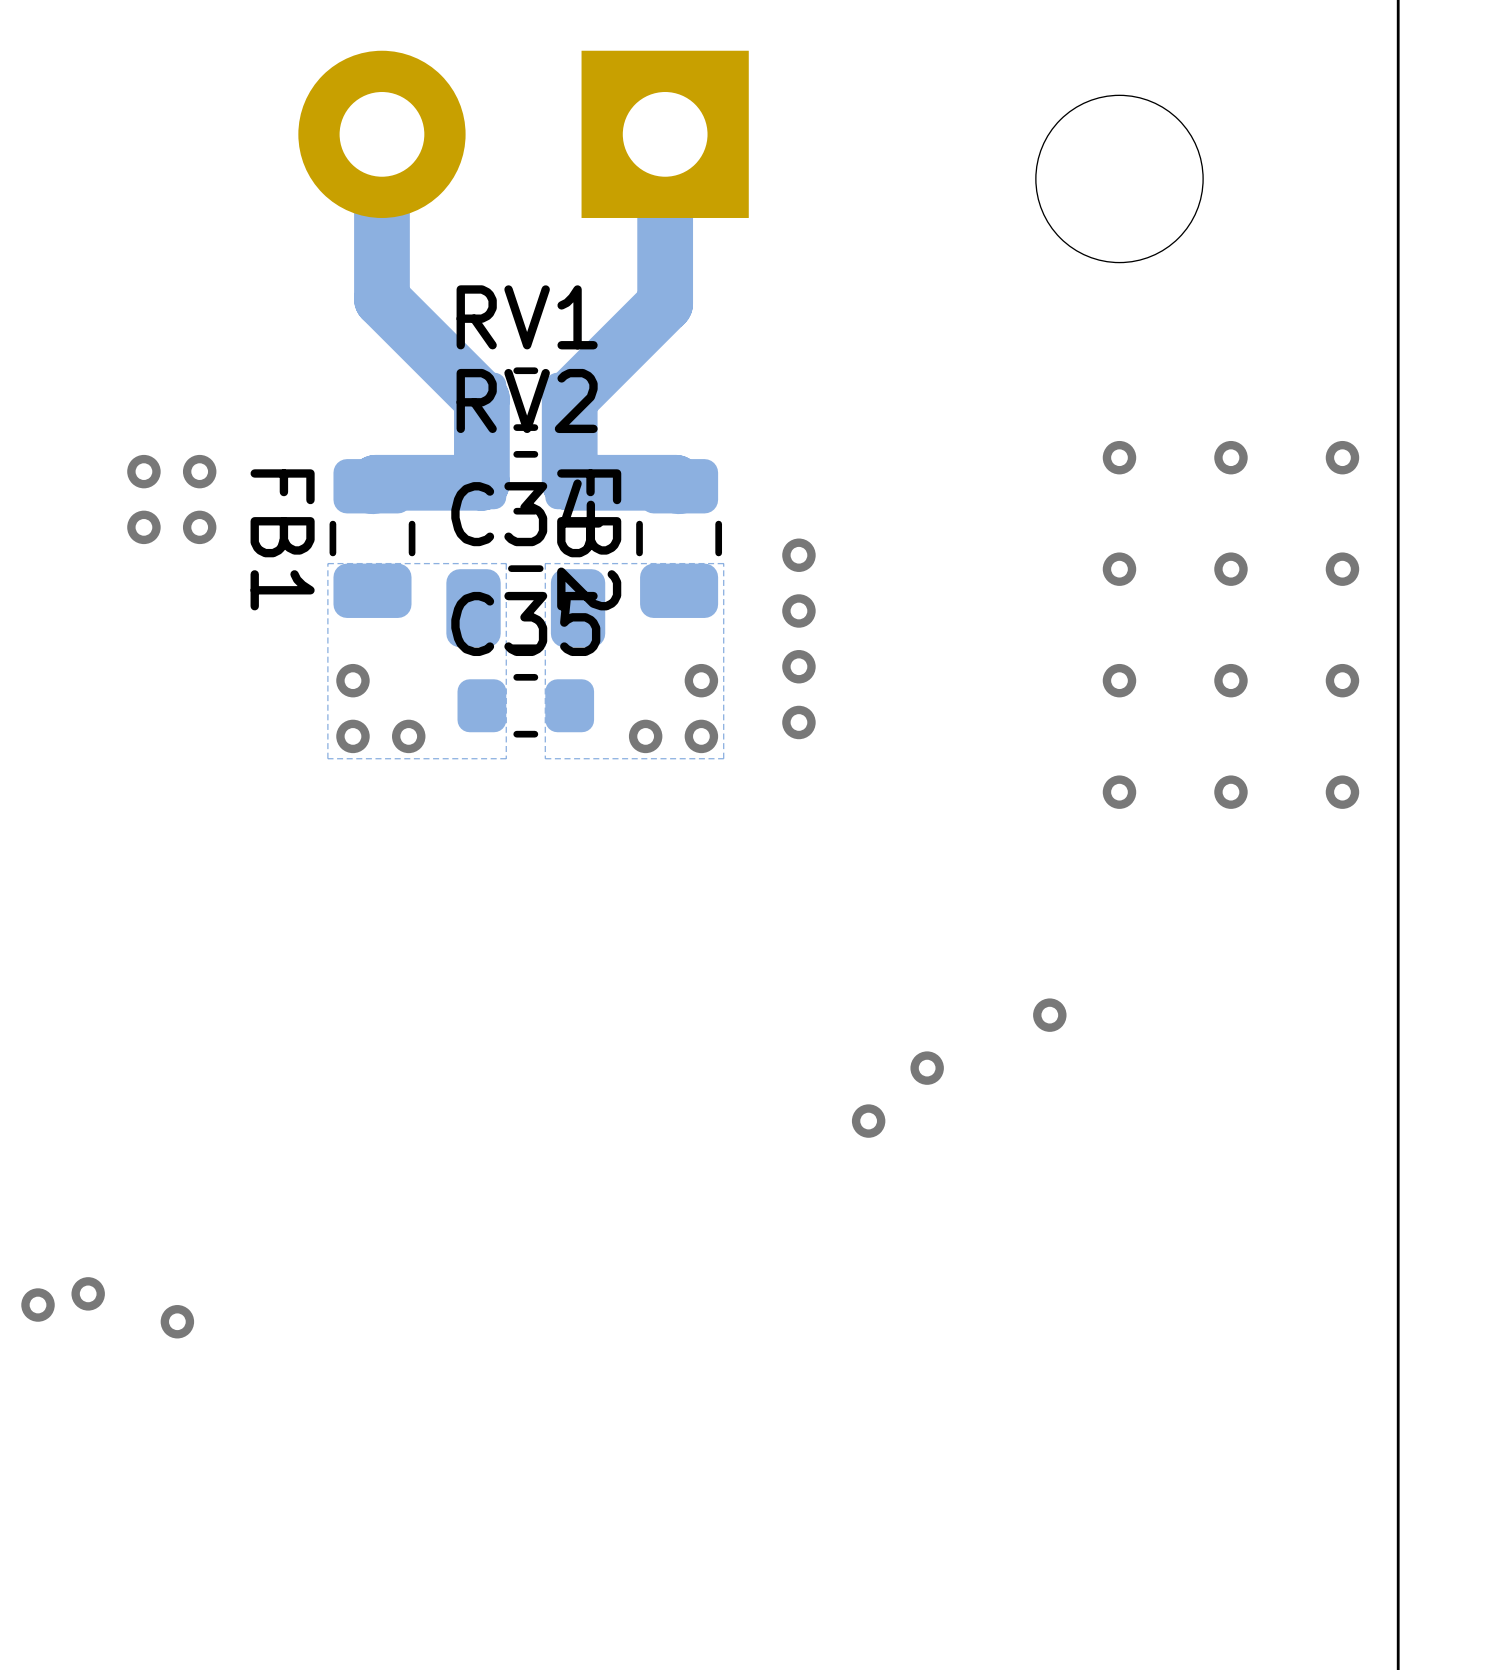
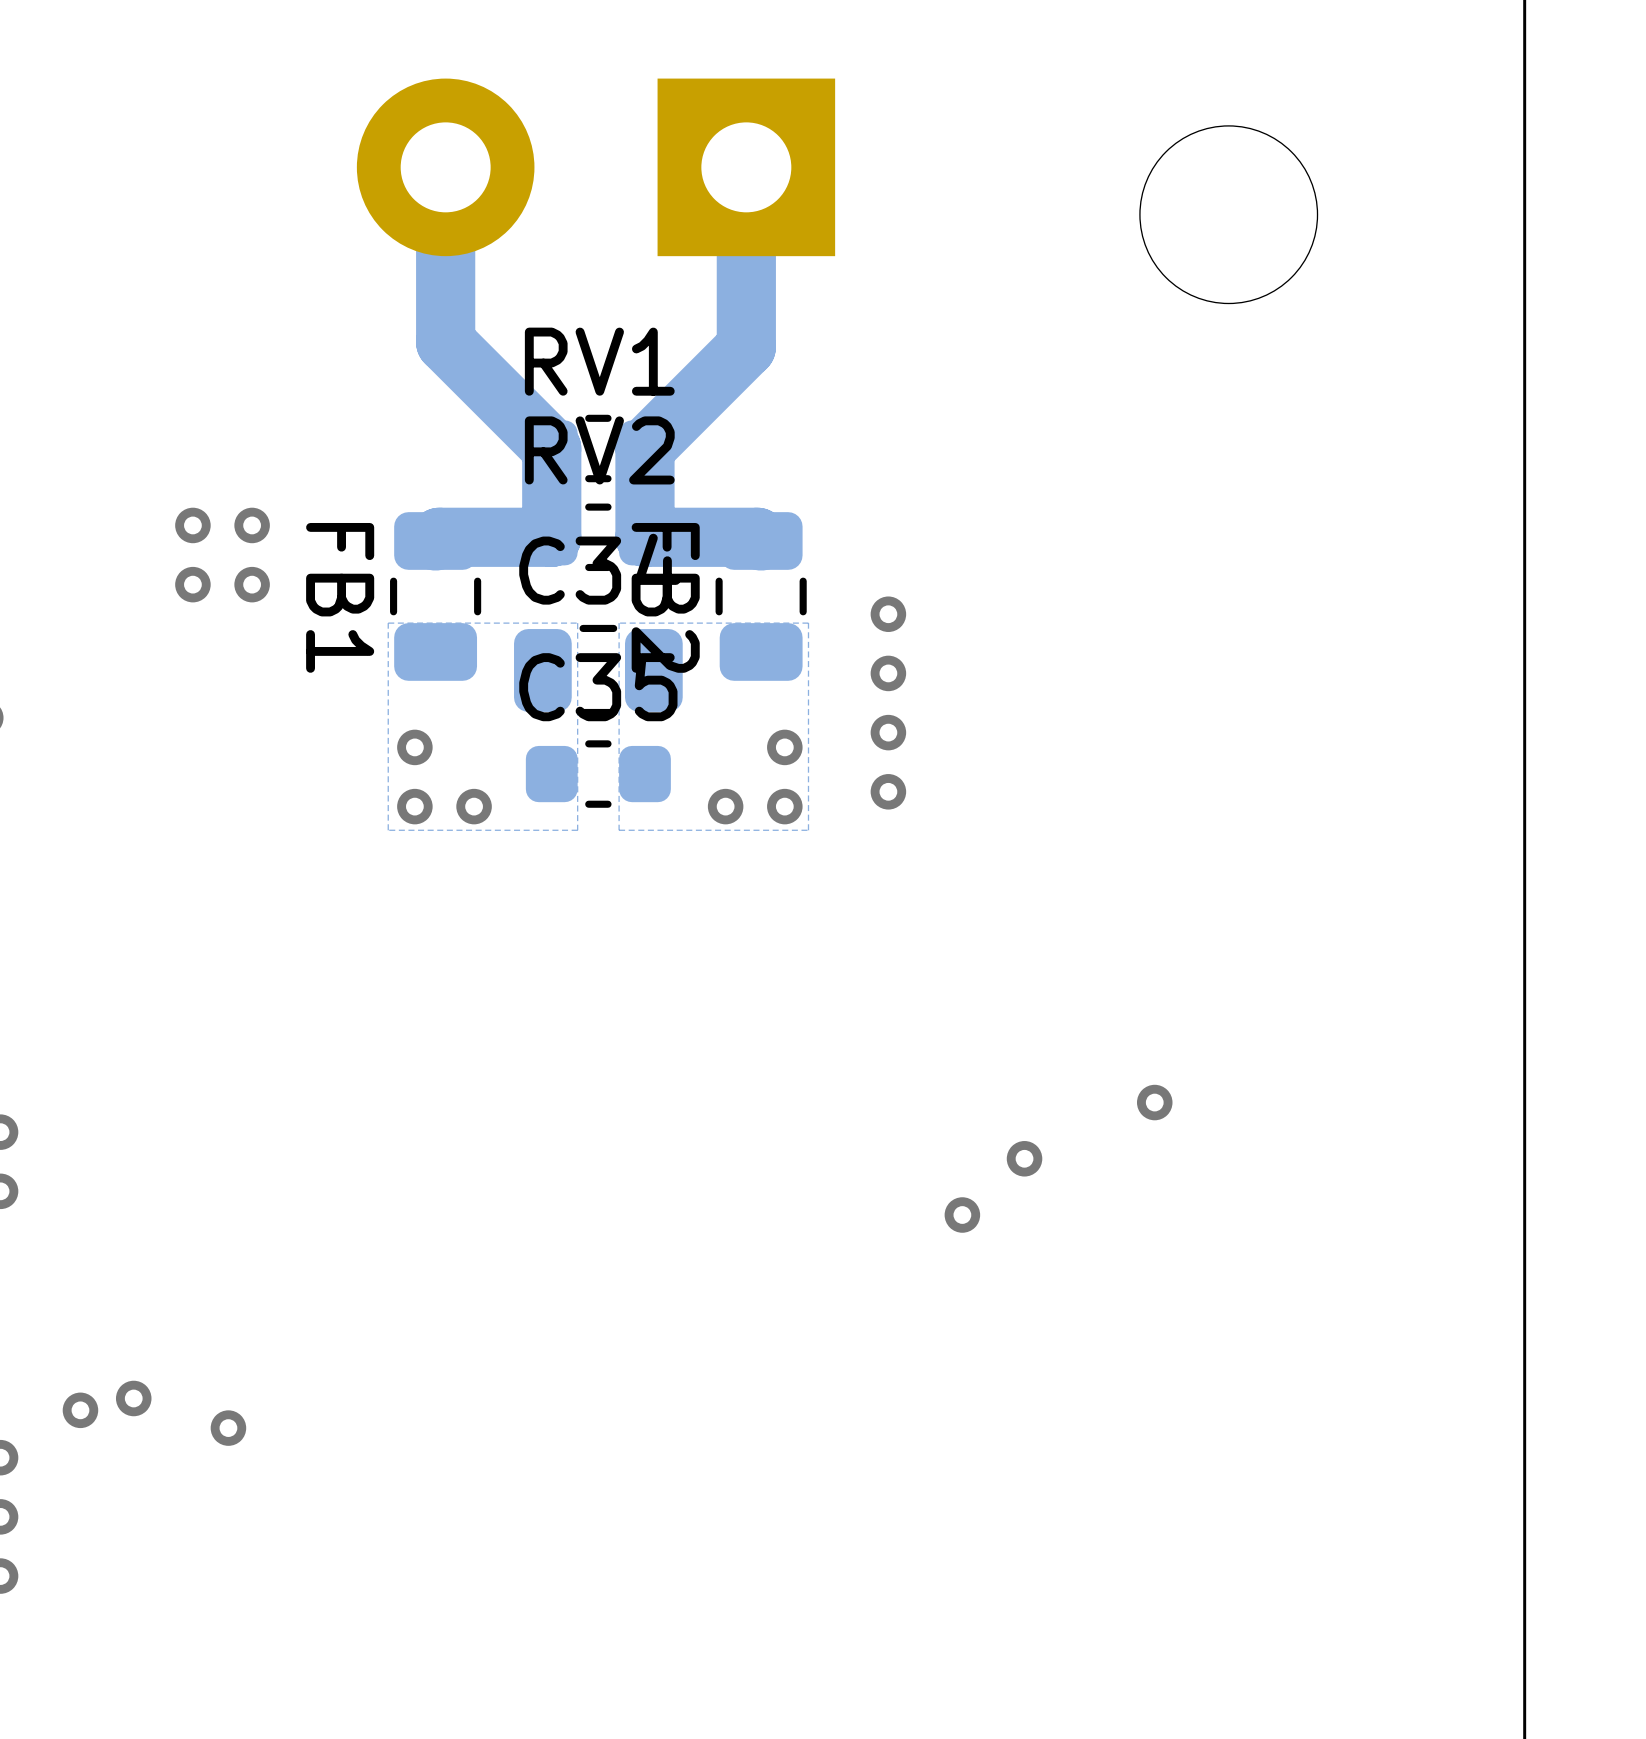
via: (1119, 457) -> none
via: (1230, 457) -> none
via: (1342, 457) -> none
via: (1119, 569) -> none
via: (1230, 569) -> none
via: (1342, 569) -> none
via: (1119, 680) -> none
via: (1230, 680) -> none
via: (1342, 680) -> none
via: (1119, 792) -> none
via: (1230, 792) -> none
via: (1342, 792) -> none

